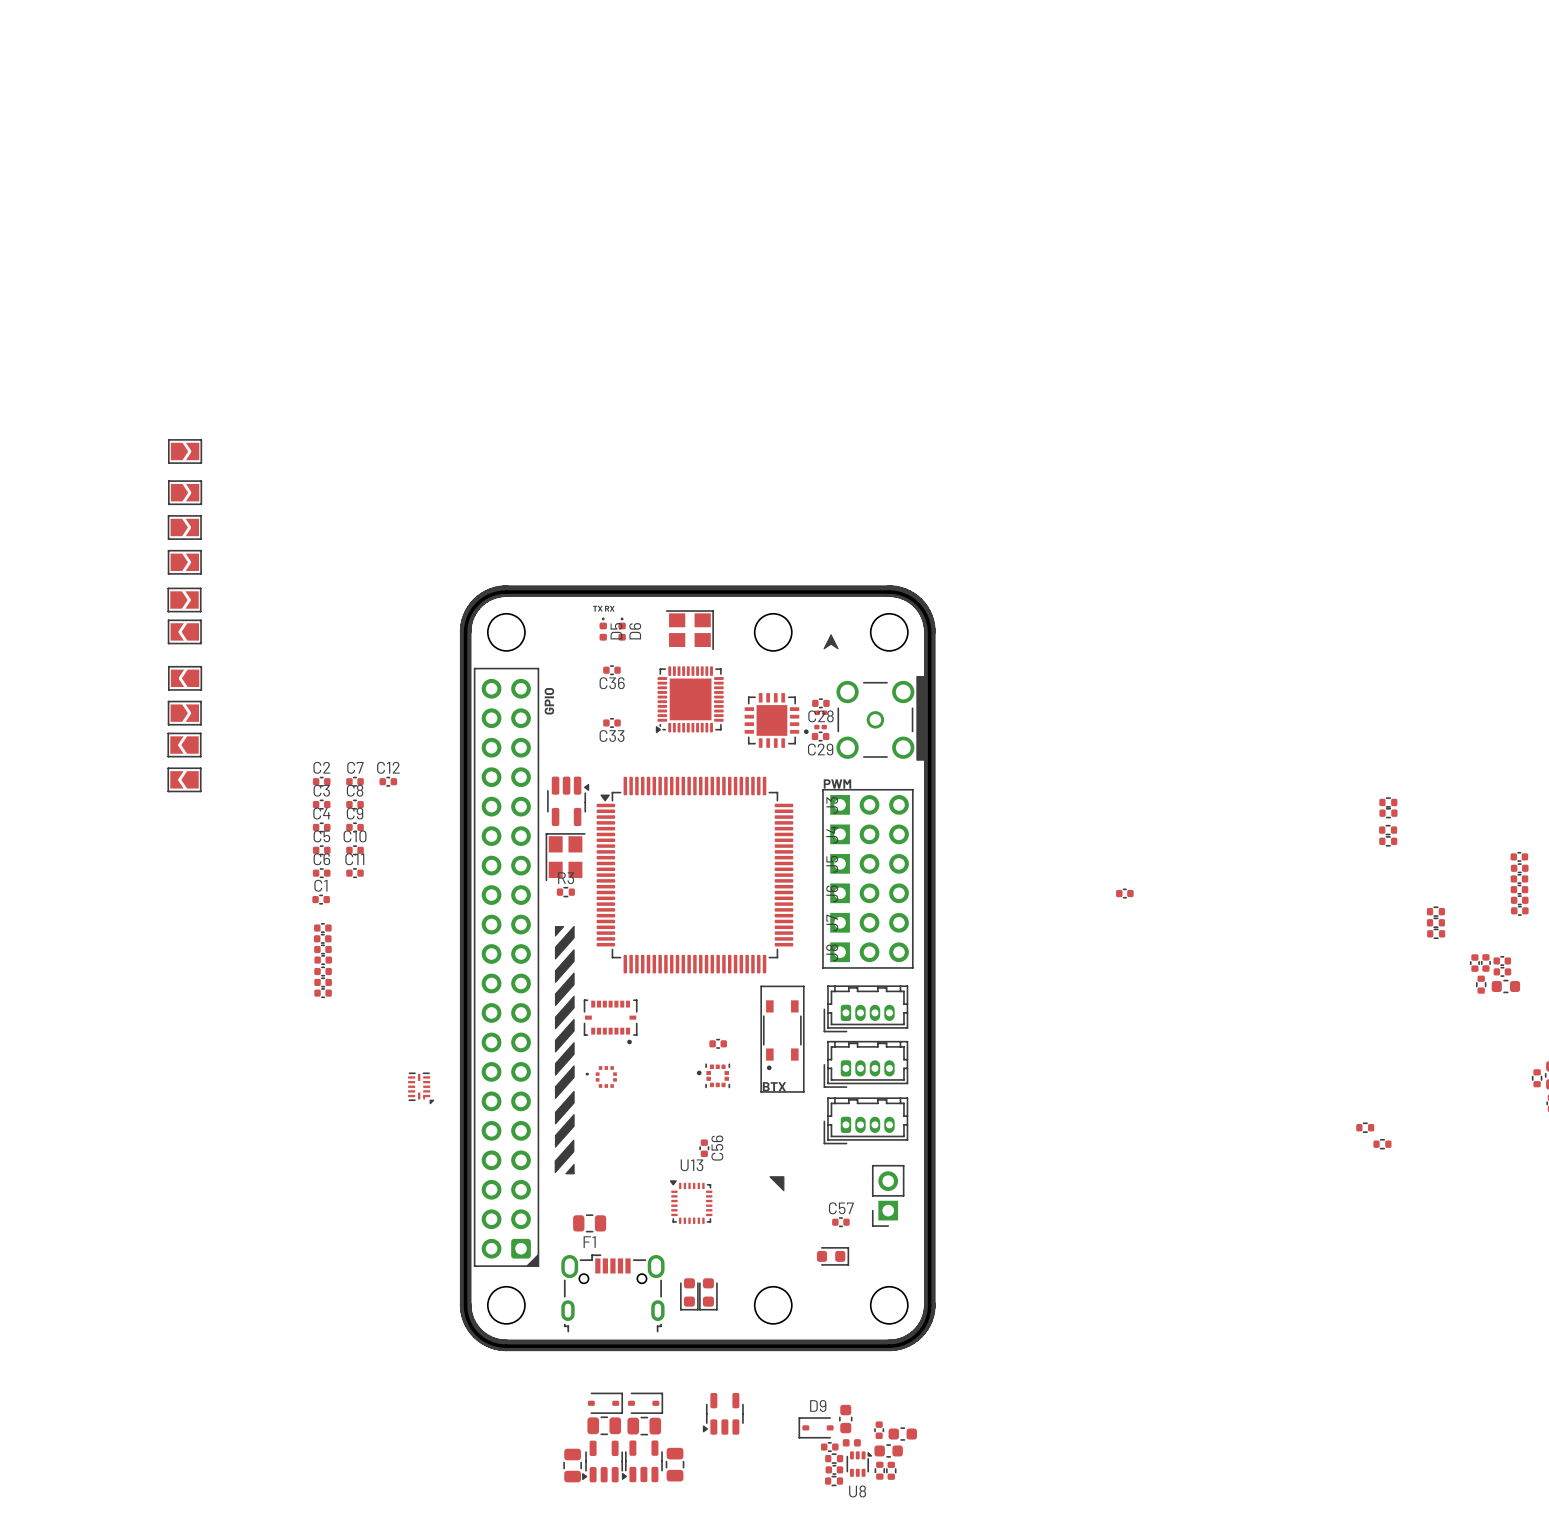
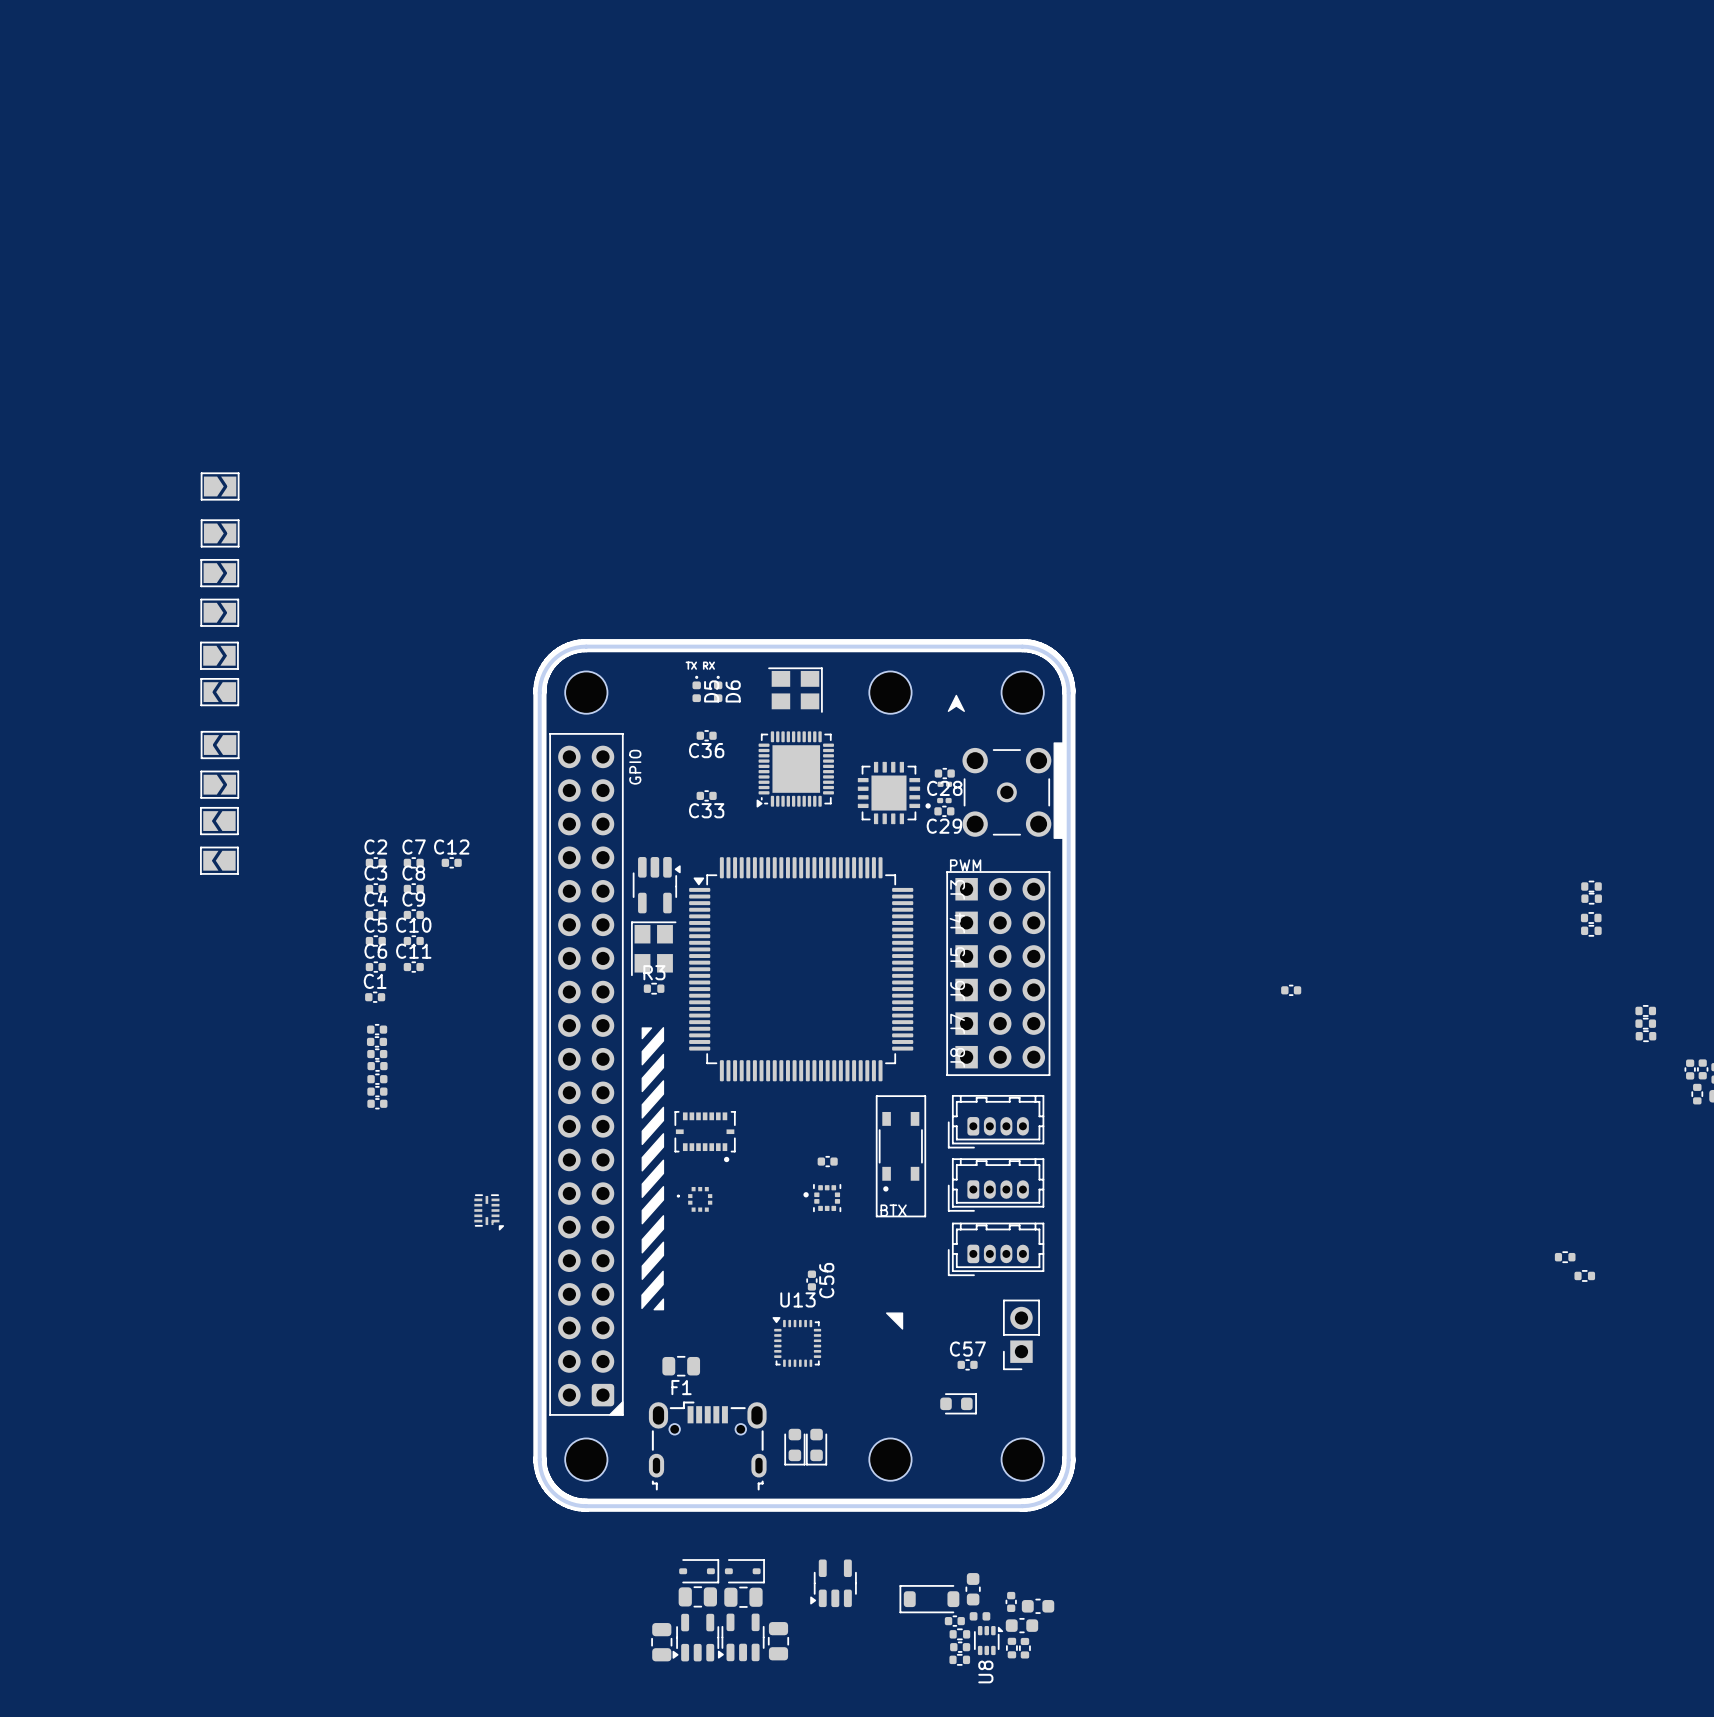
part: none -> (929, 1599)
D9: (816, 1427) -> none
U8 name rotation: 0° (857, 1491) -> 90° counterclockwise (985, 1671)

